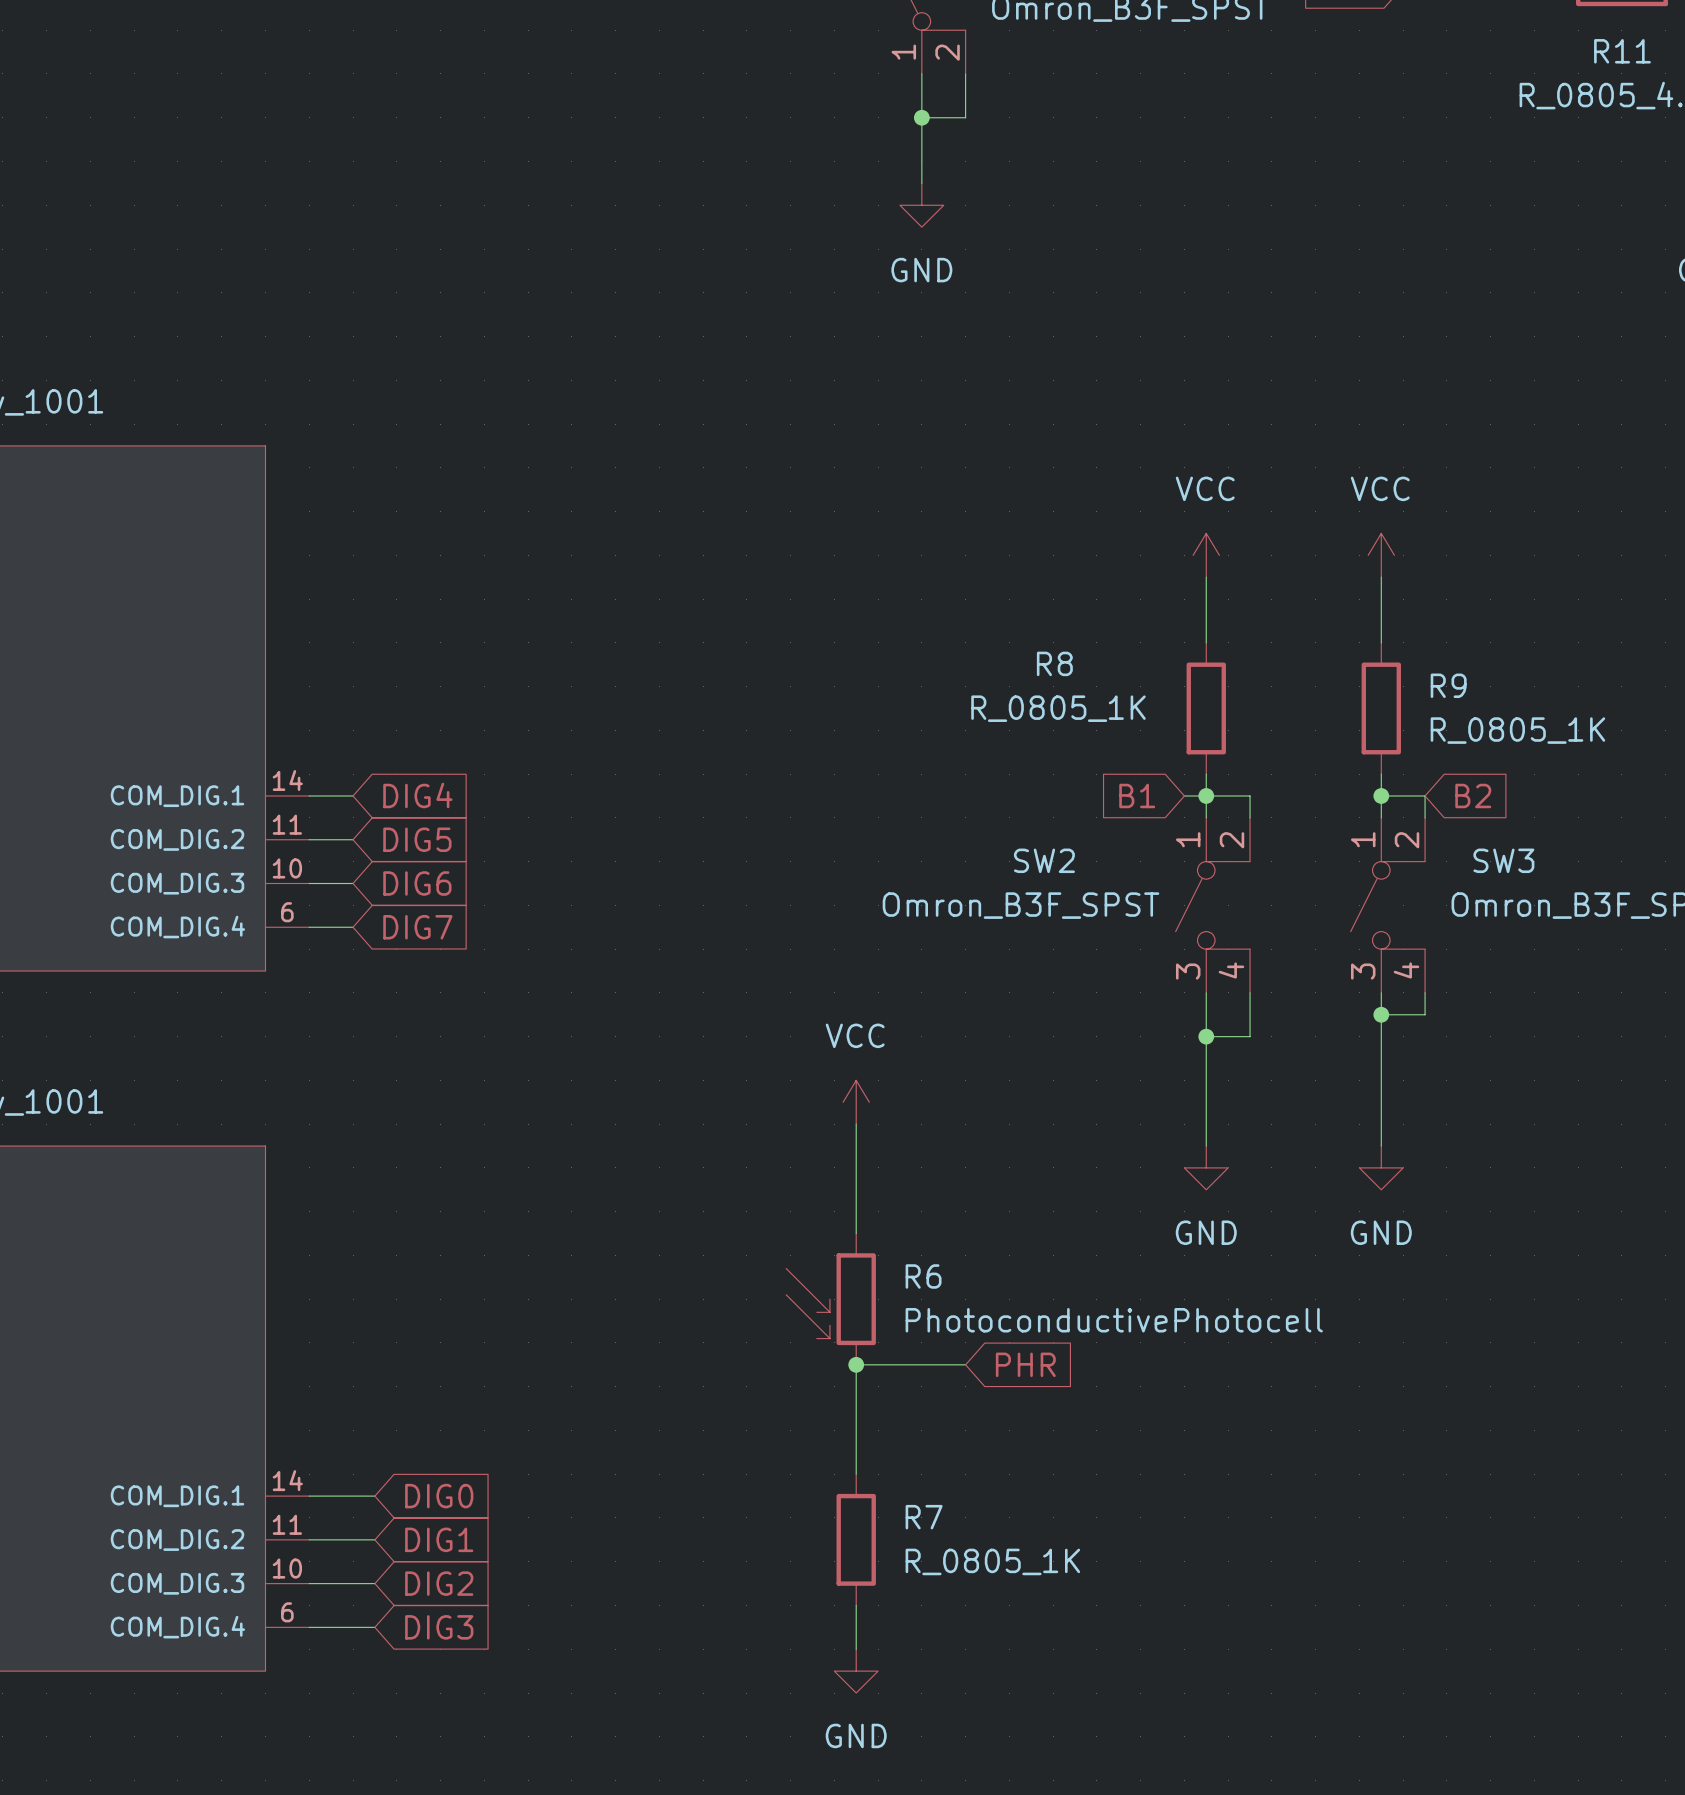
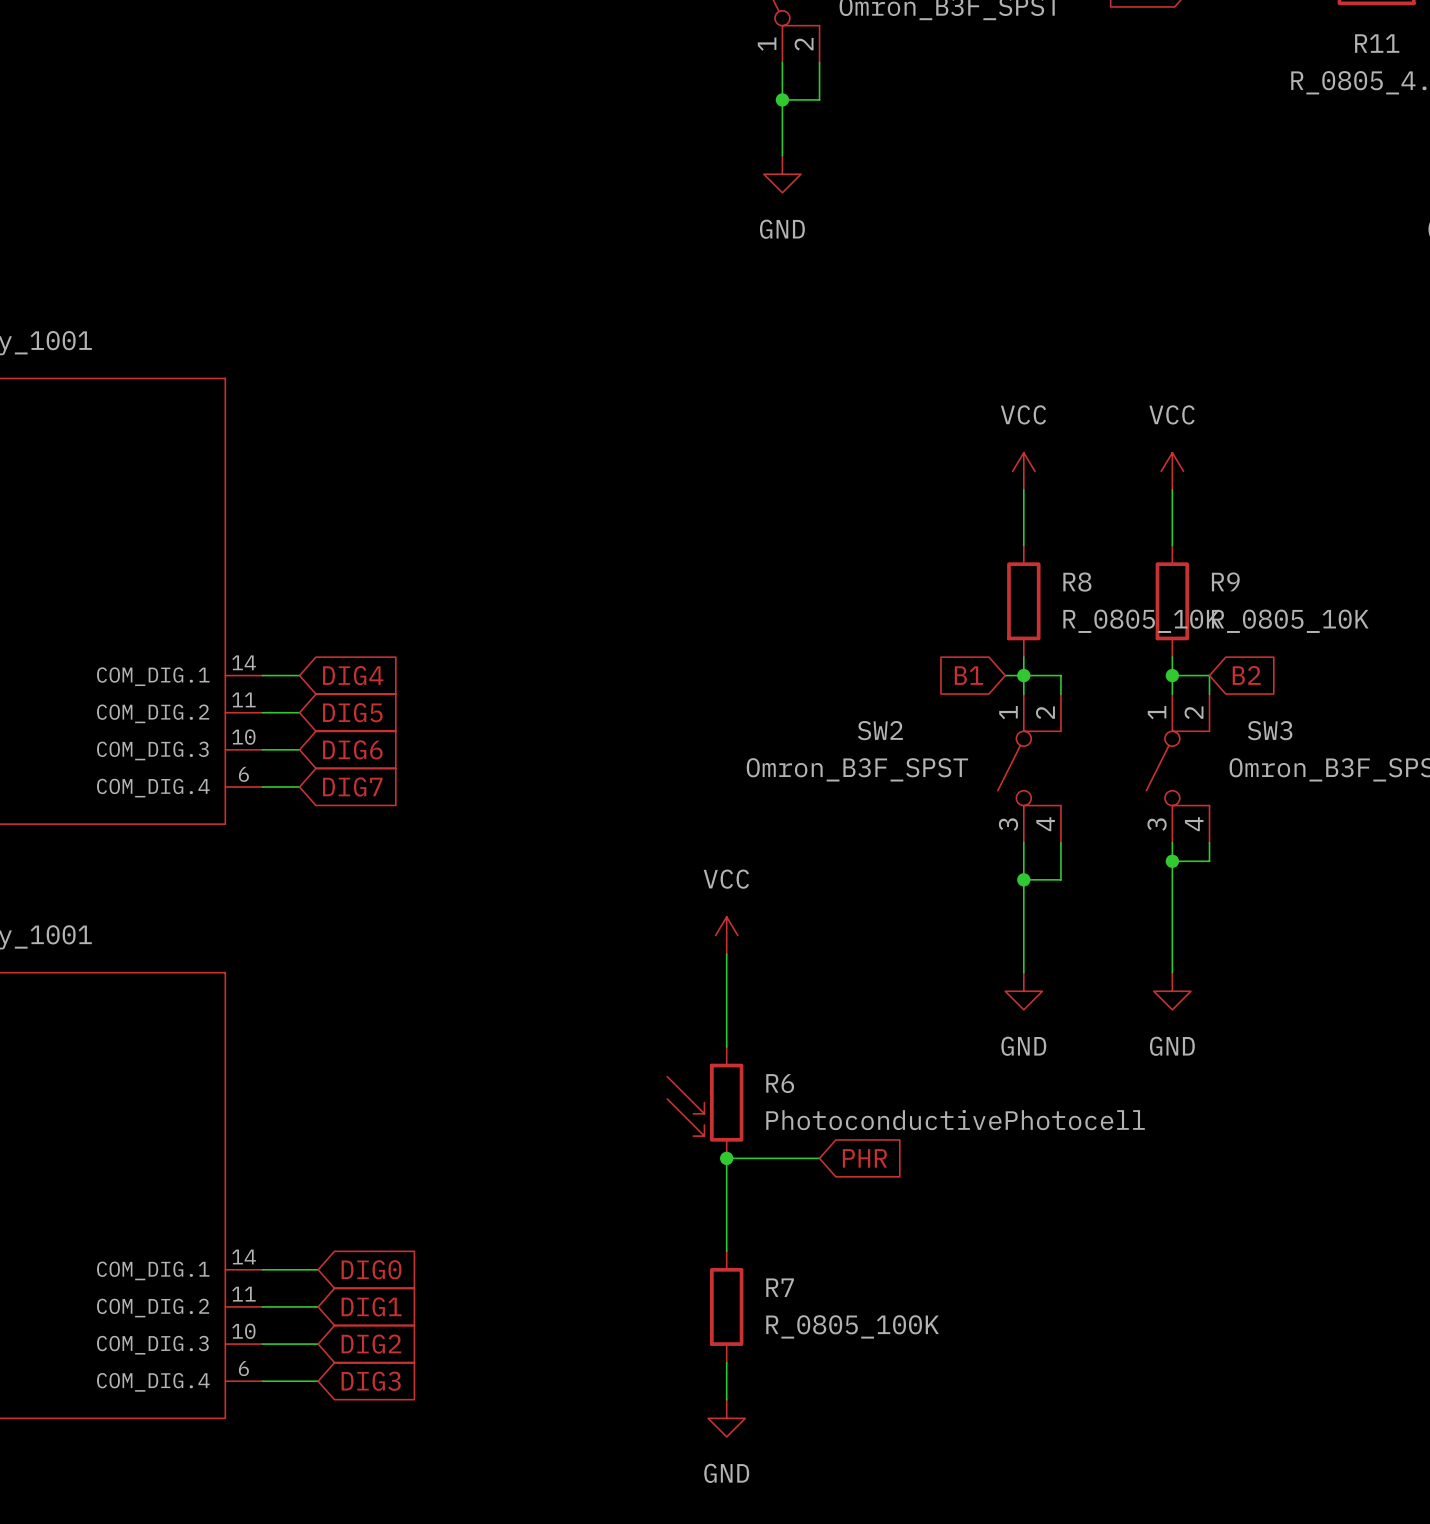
R8 name position: R8 (1054, 663) -> R8 (1077, 582)
R8 value: R_0805_1K (1058, 708) -> R_0805_10K (1141, 621)
R9 value: R_0805_1K (1517, 730) -> R_0805_10K (1290, 621)
R7 value: R_0805_1K (992, 1561) -> R_0805_100K (852, 1326)

